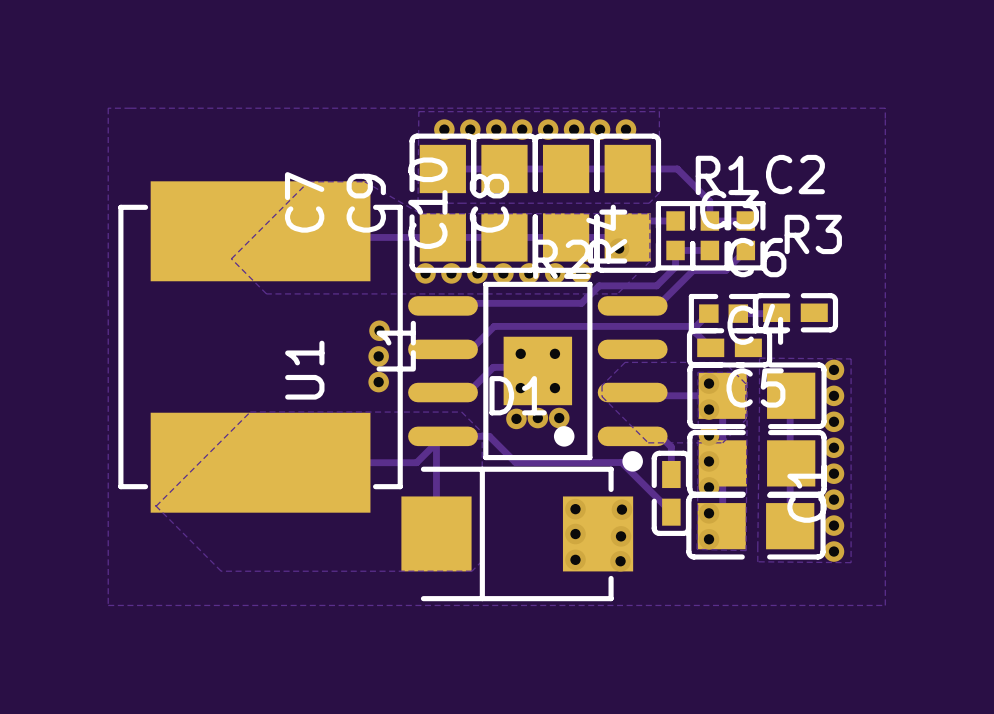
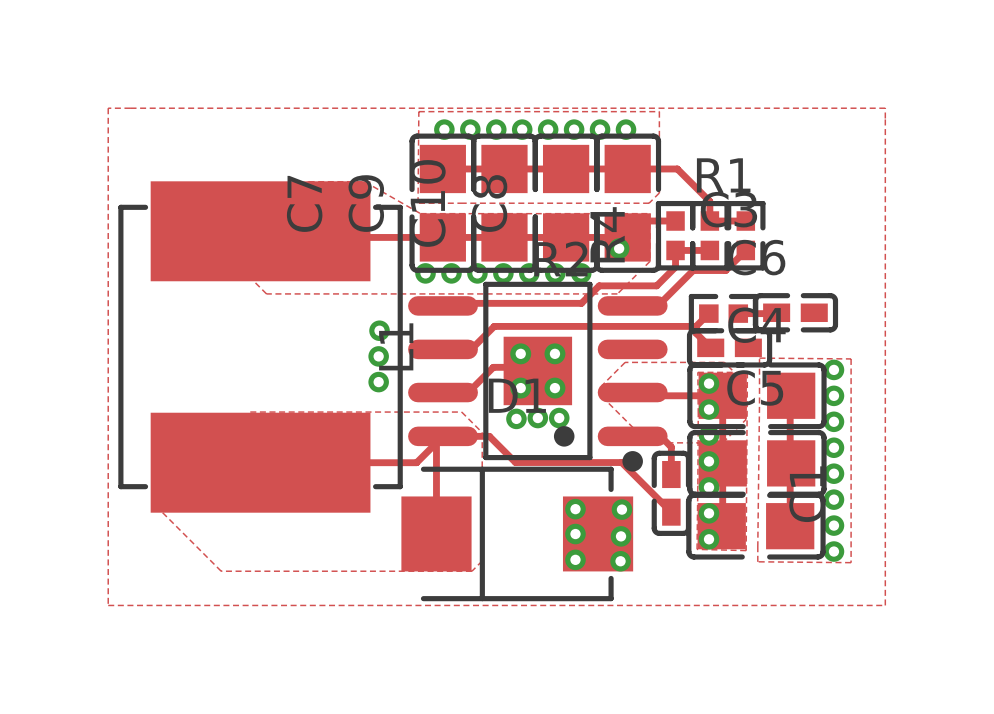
C2 name: C2 (795, 174) -> none
R3 name: R3 (813, 234) -> none
U1 name: U1 (304, 370) -> none

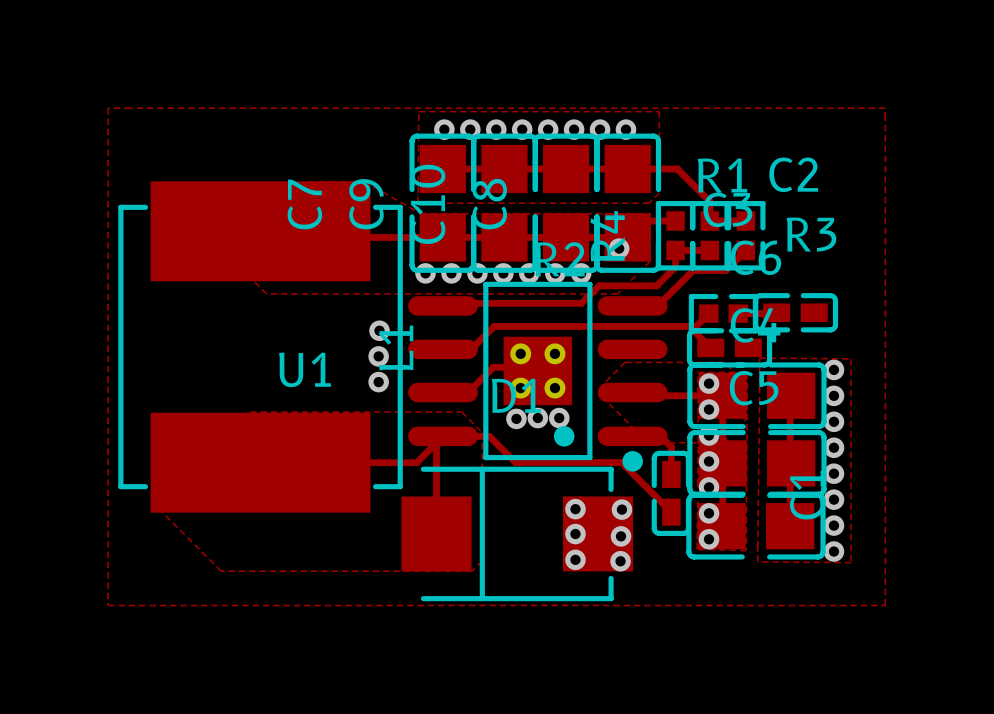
C2 name: none -> C2 (793, 174)
R3 name: none -> R3 (811, 234)
U1 name: none -> U1 (304, 369)

